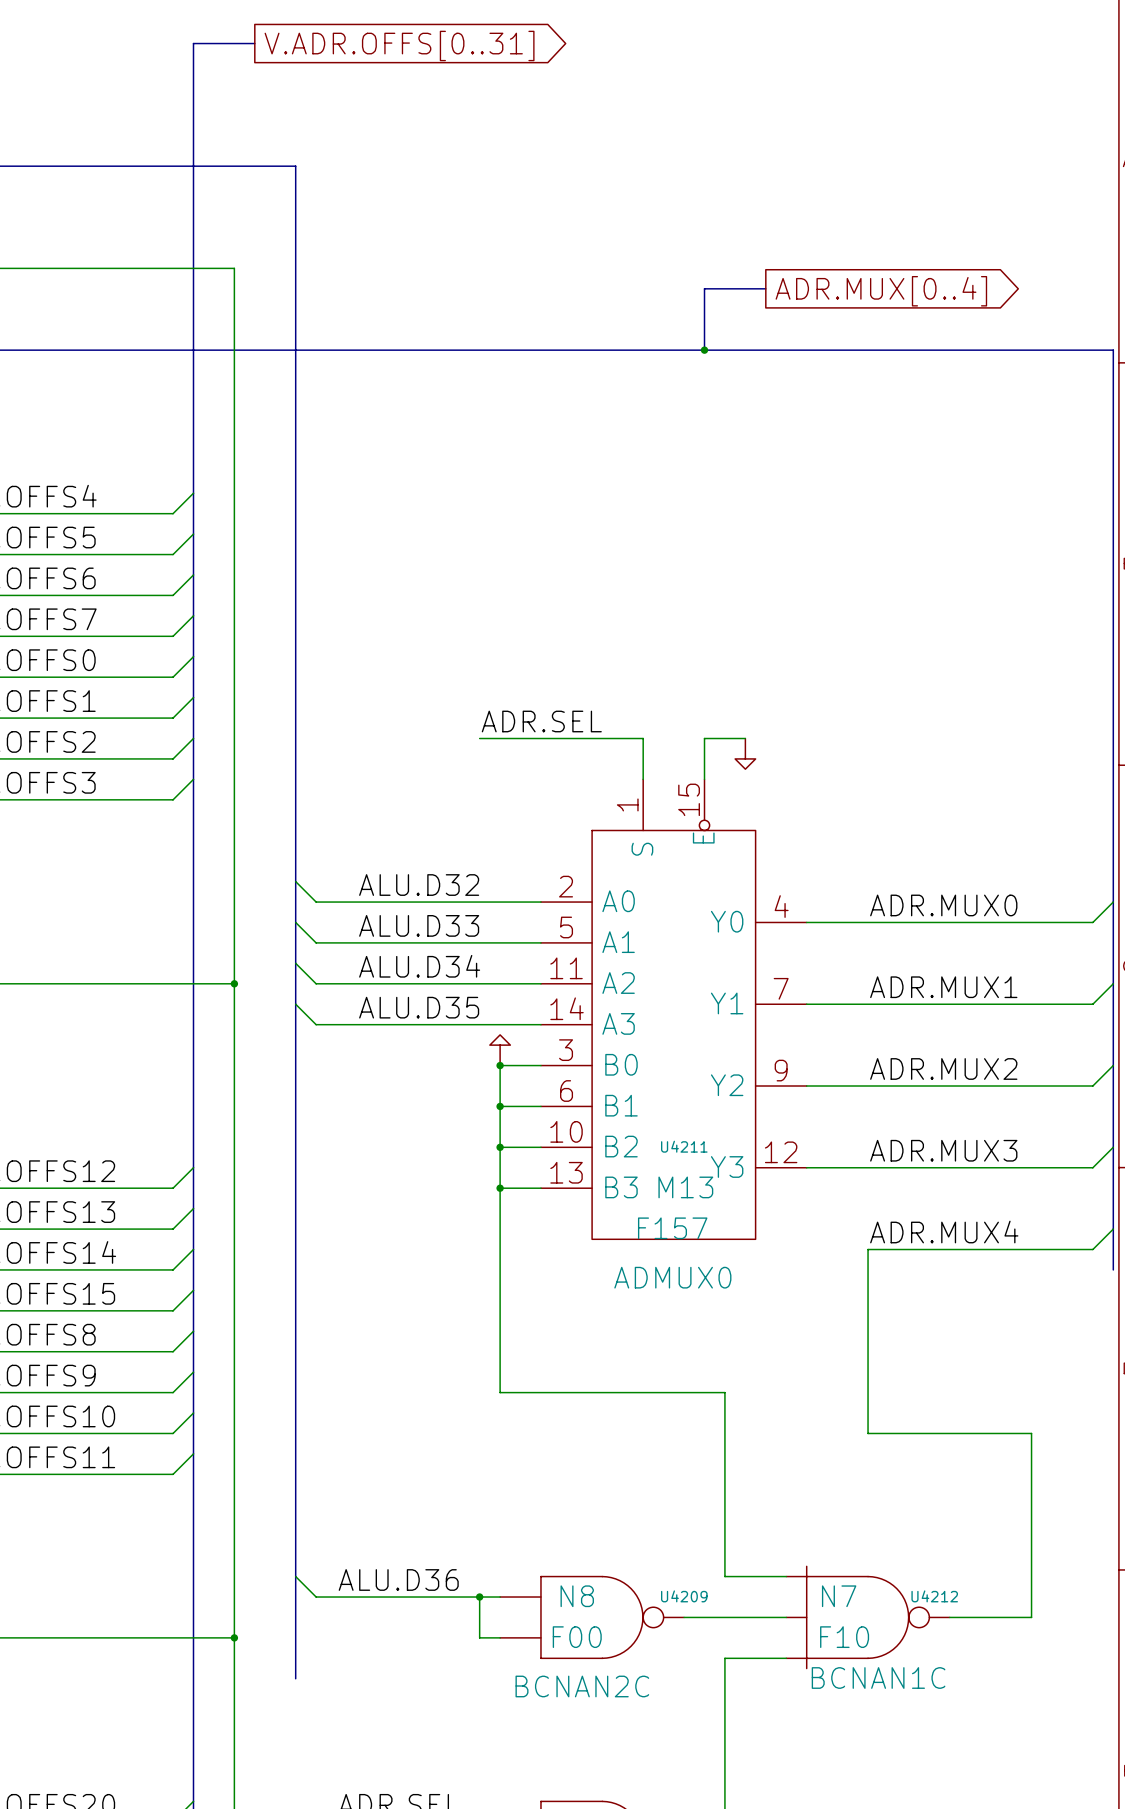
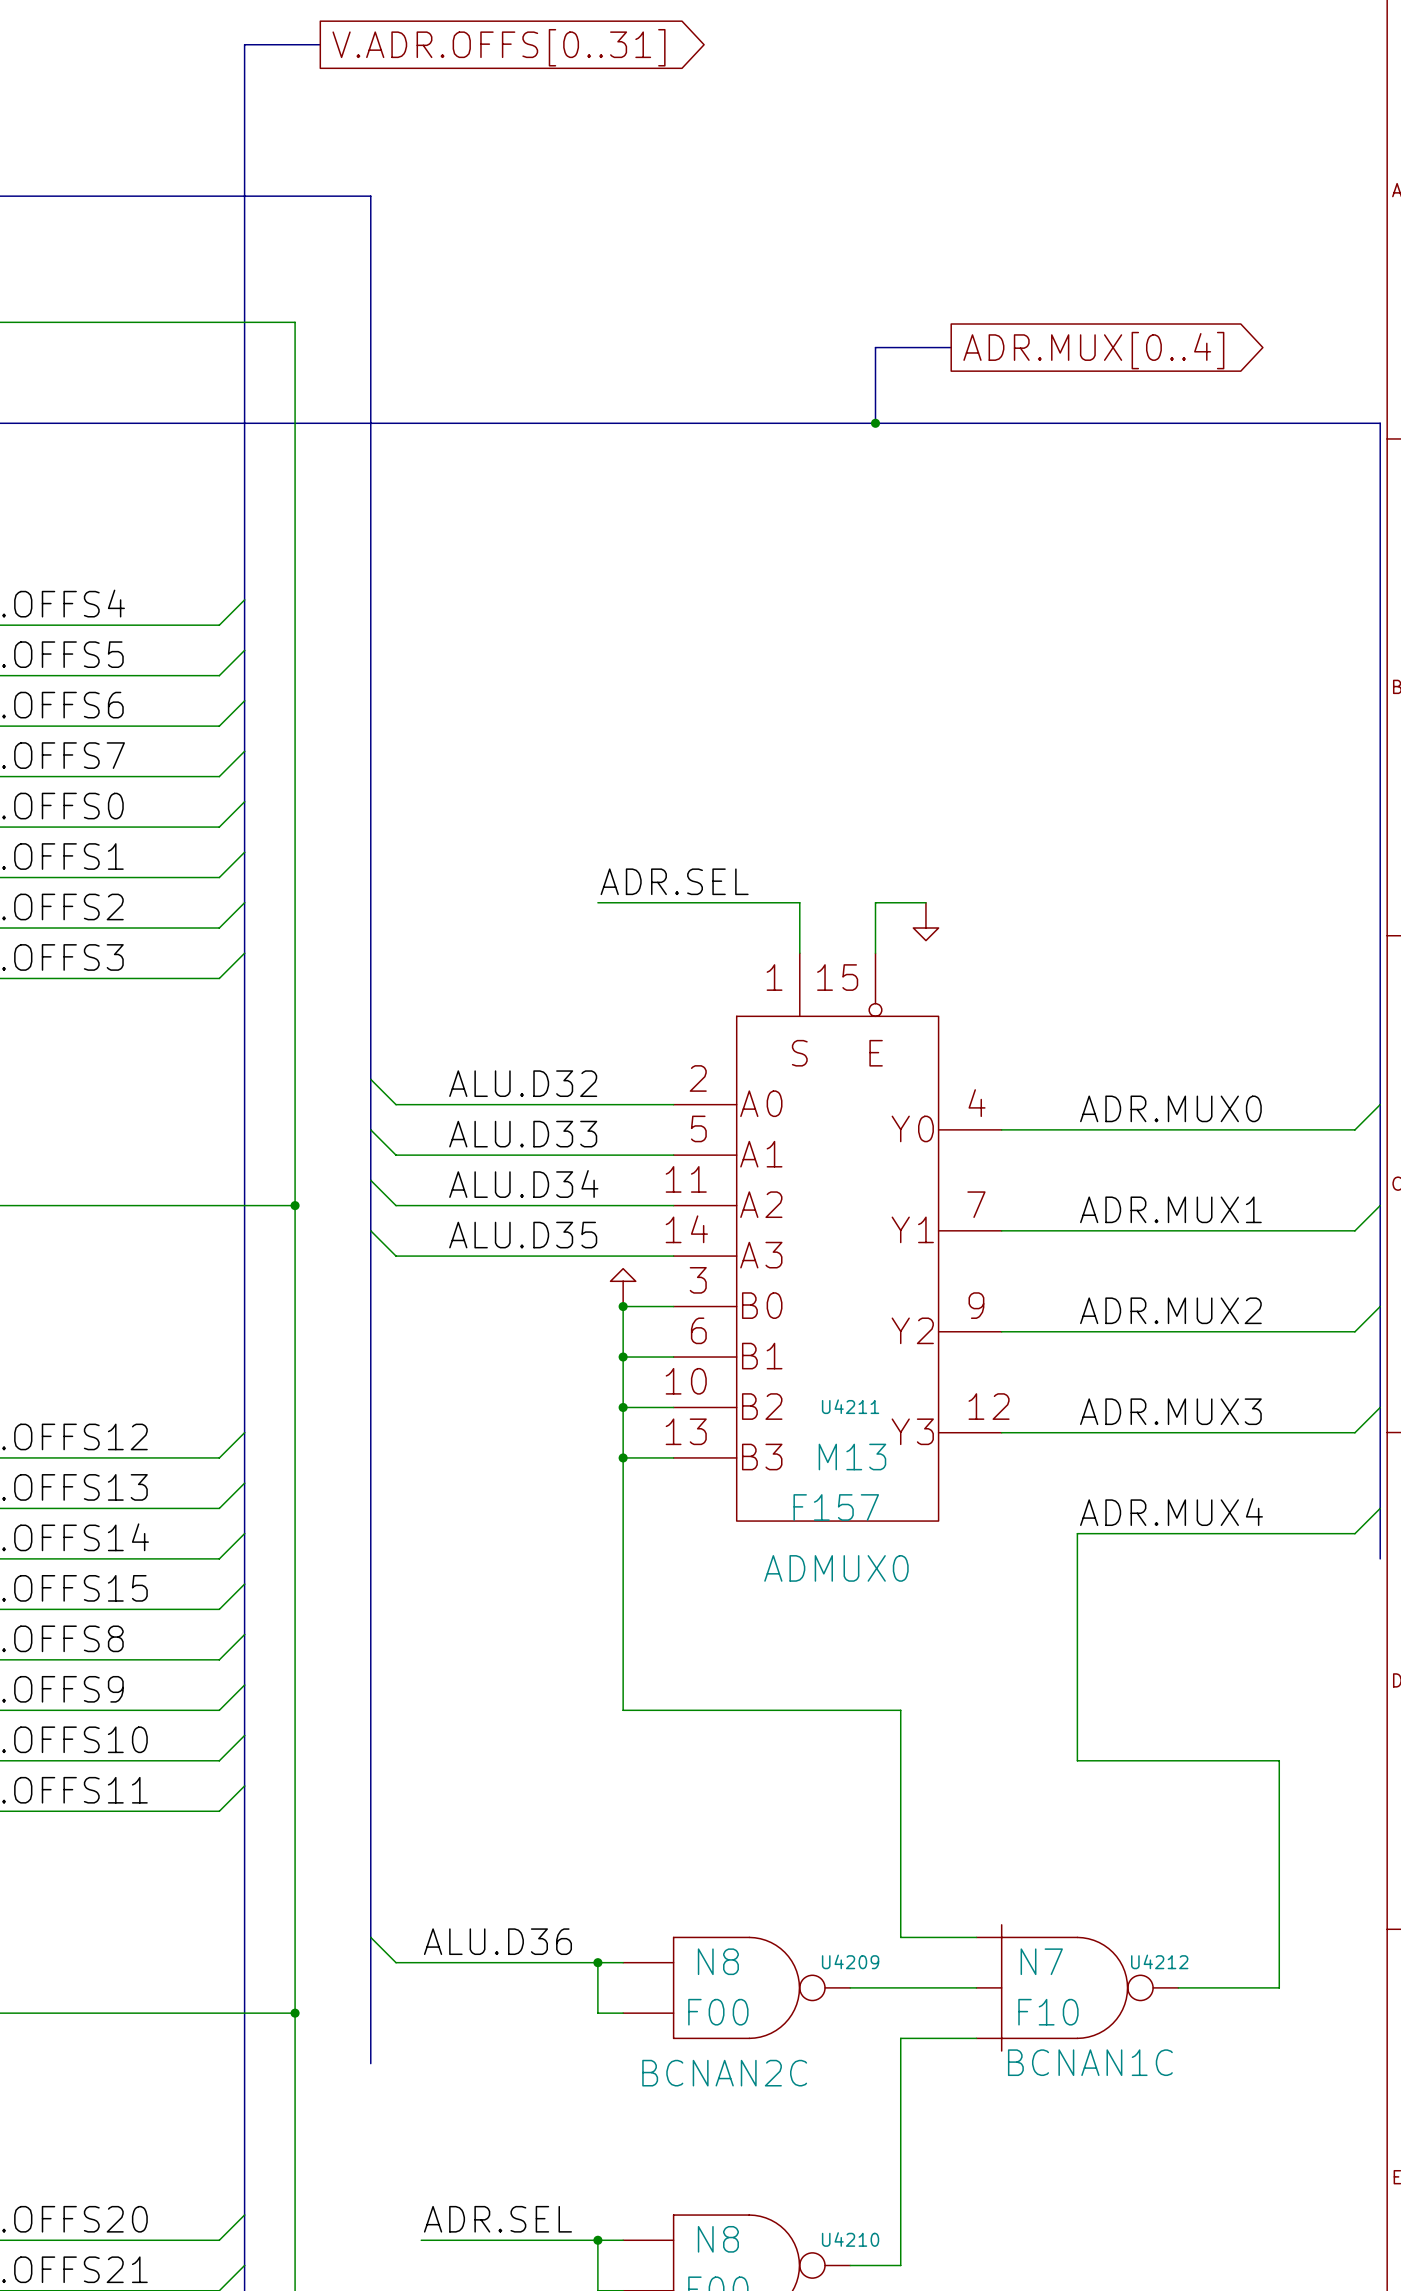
U4211 symbol: [540, 779, 807, 1240] -> [673, 953, 1002, 1522]

